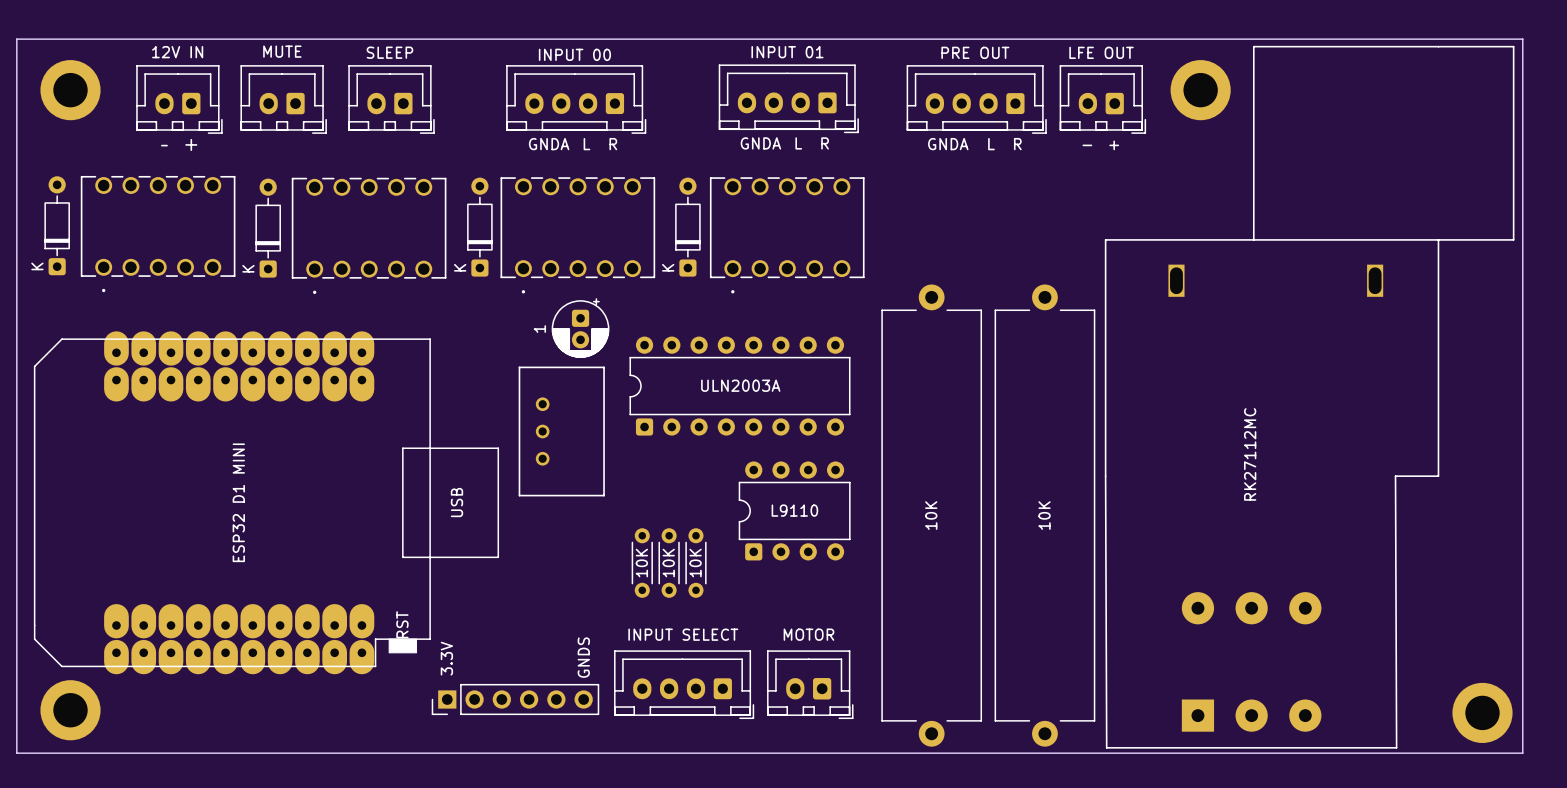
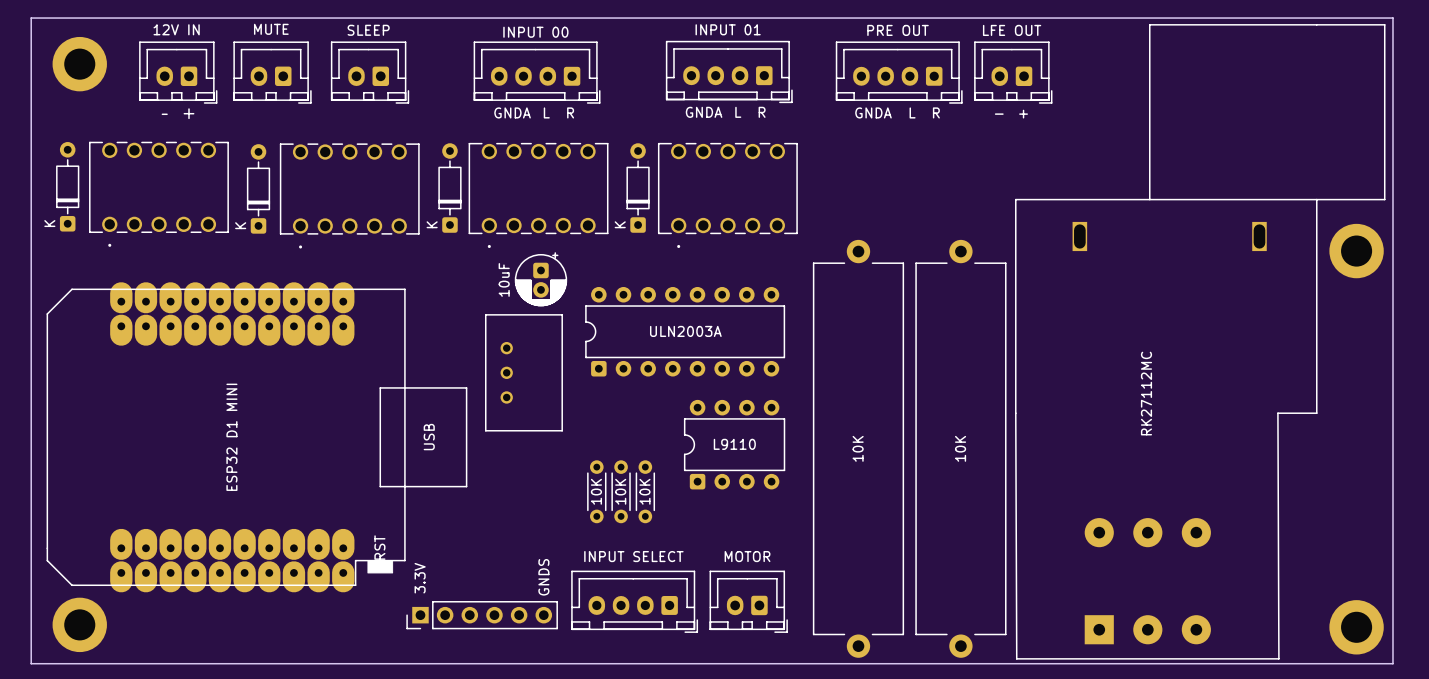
part: (1200, 90) -> none
part: none -> (1356, 251)
part value: 1 (539, 329) -> 10uF (504, 279)

